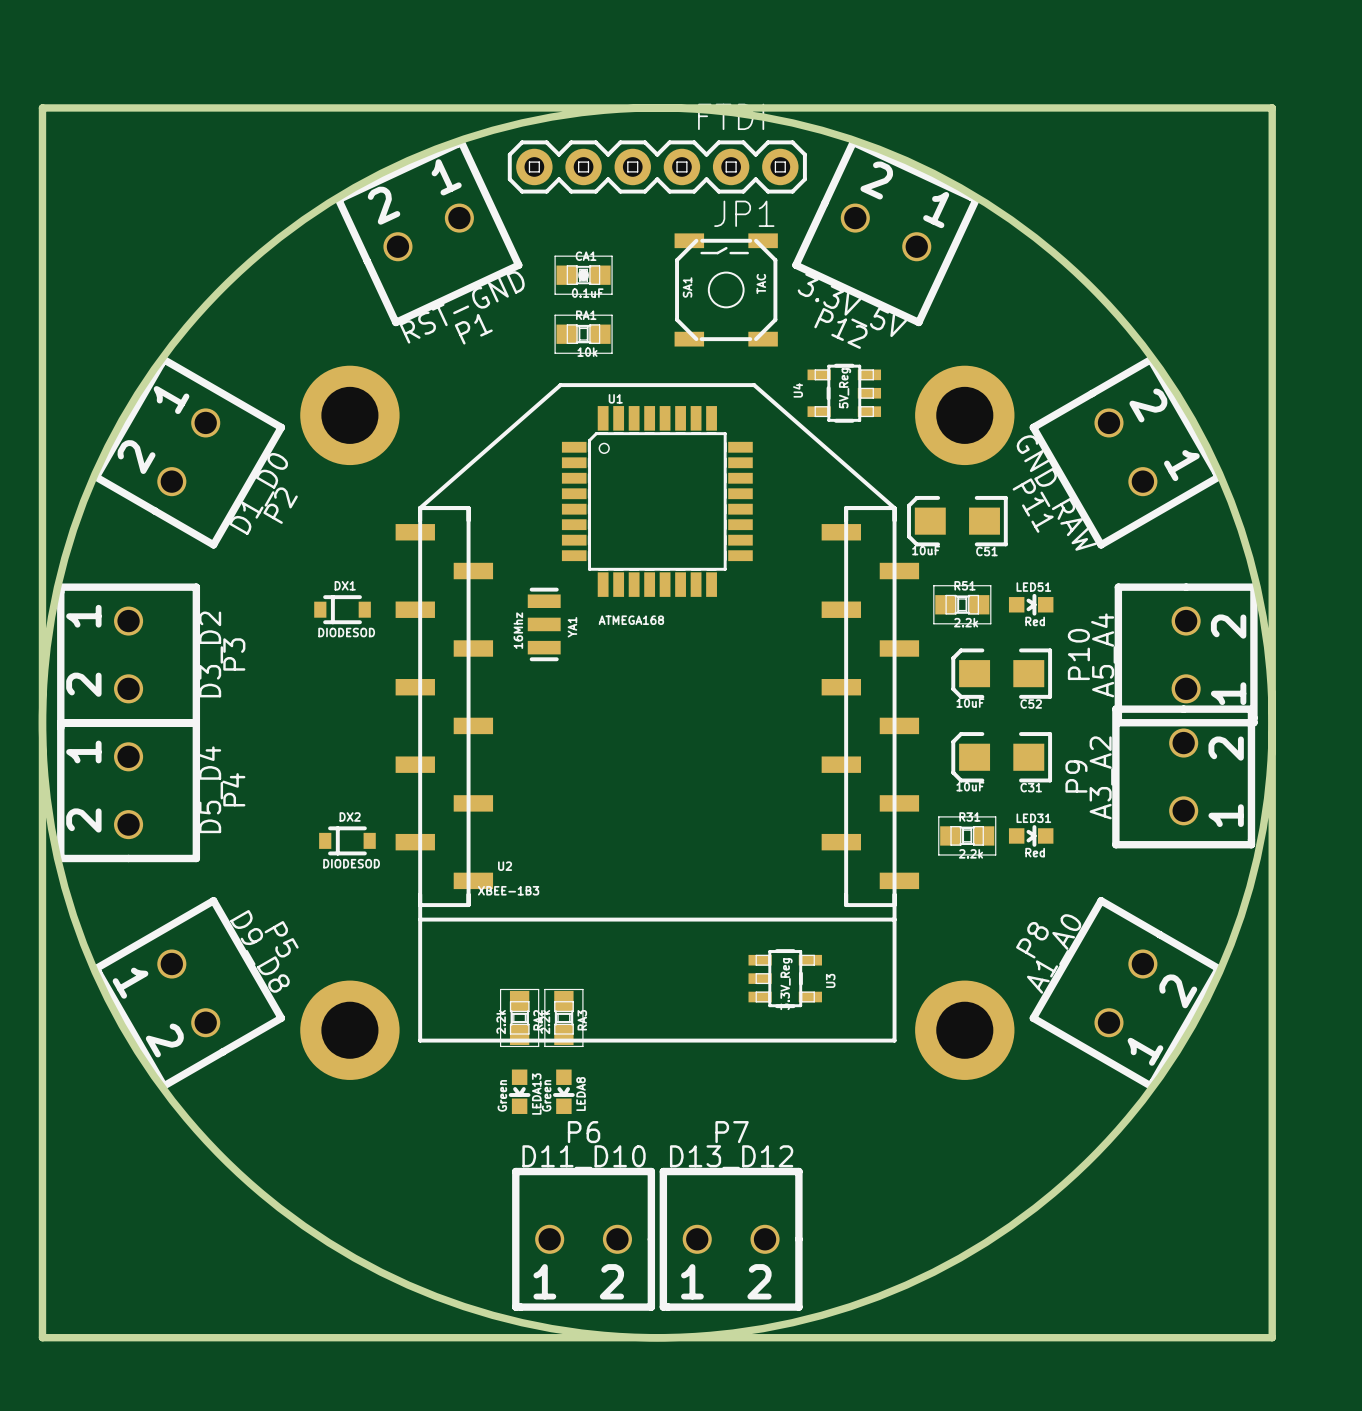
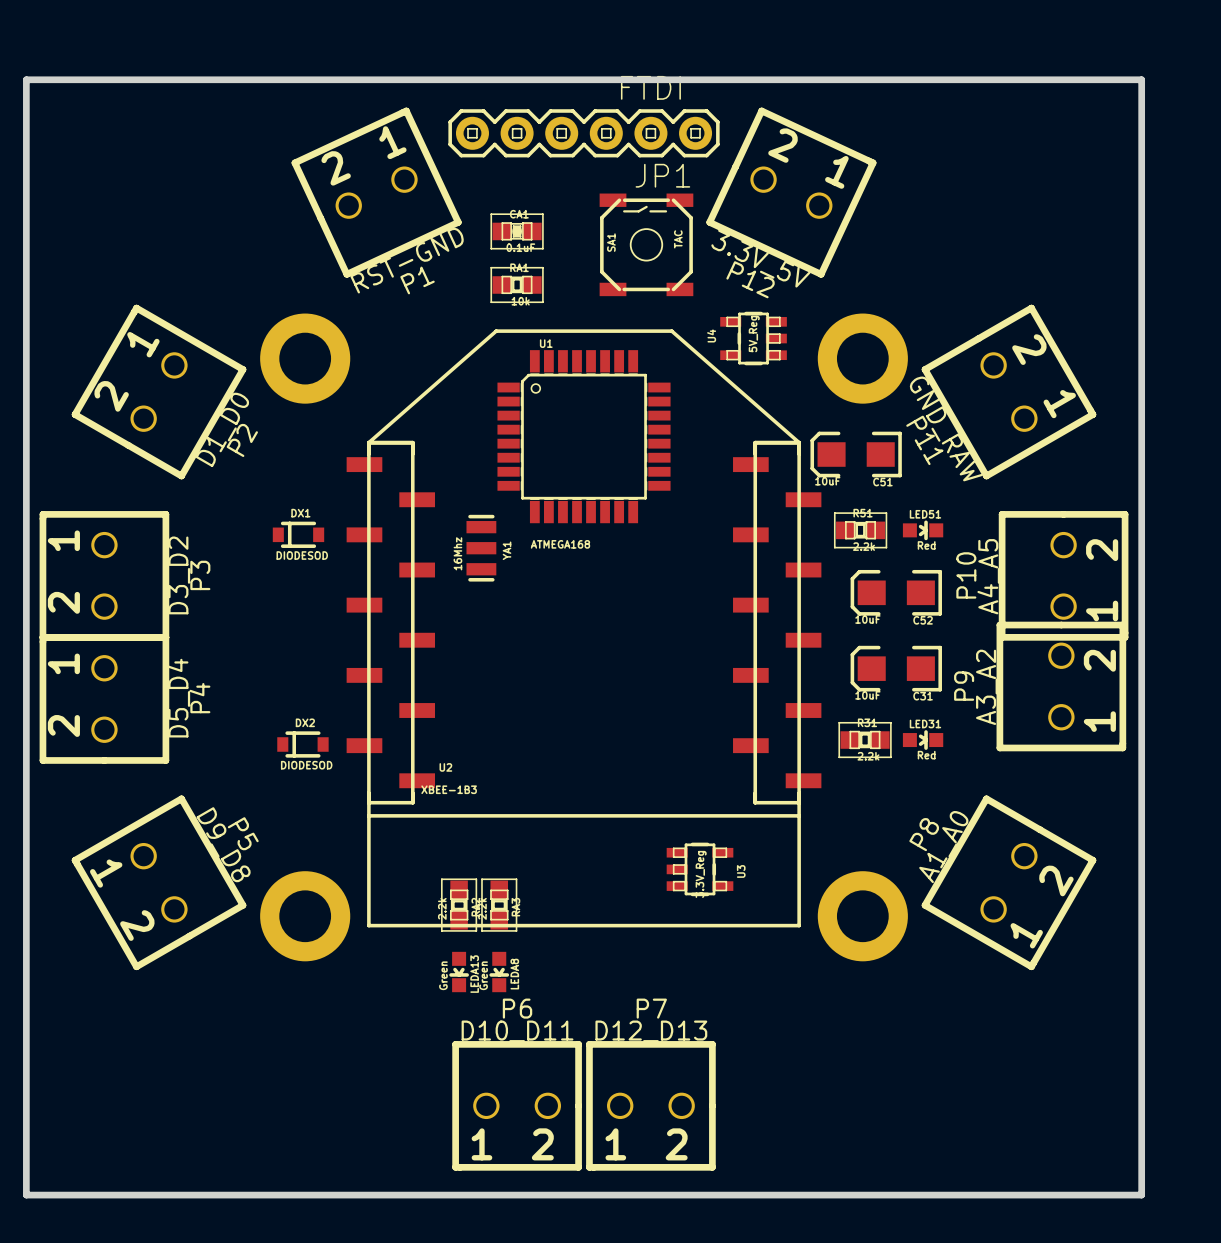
round board edge: [38, 104, 1276, 1342] -> none
P10 value: A5_A4 (1103, 655) -> A4_A5 (988, 576)
P6 value: D11_D10 (584, 1157) -> D10_D11 (517, 1031)
P7 value: D13_D12 (731, 1157) -> D12_D13 (651, 1031)

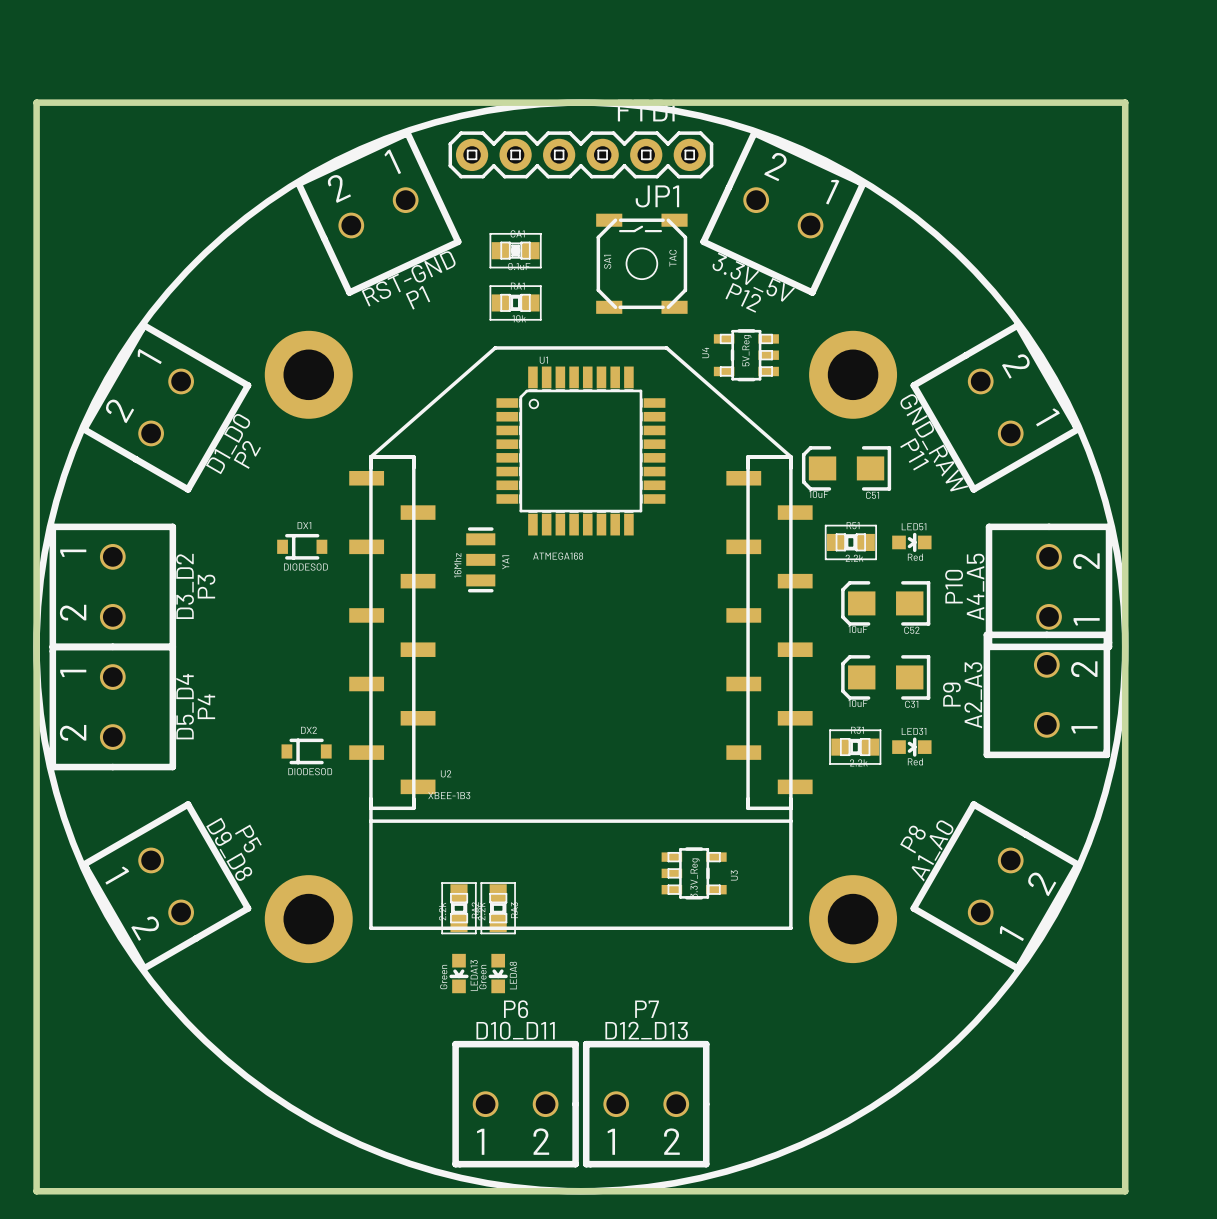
drawing: none -> [33, 99, 1129, 1195]
P9 value: A3_A2 (986, 687) -> A2_A3 (973, 695)

